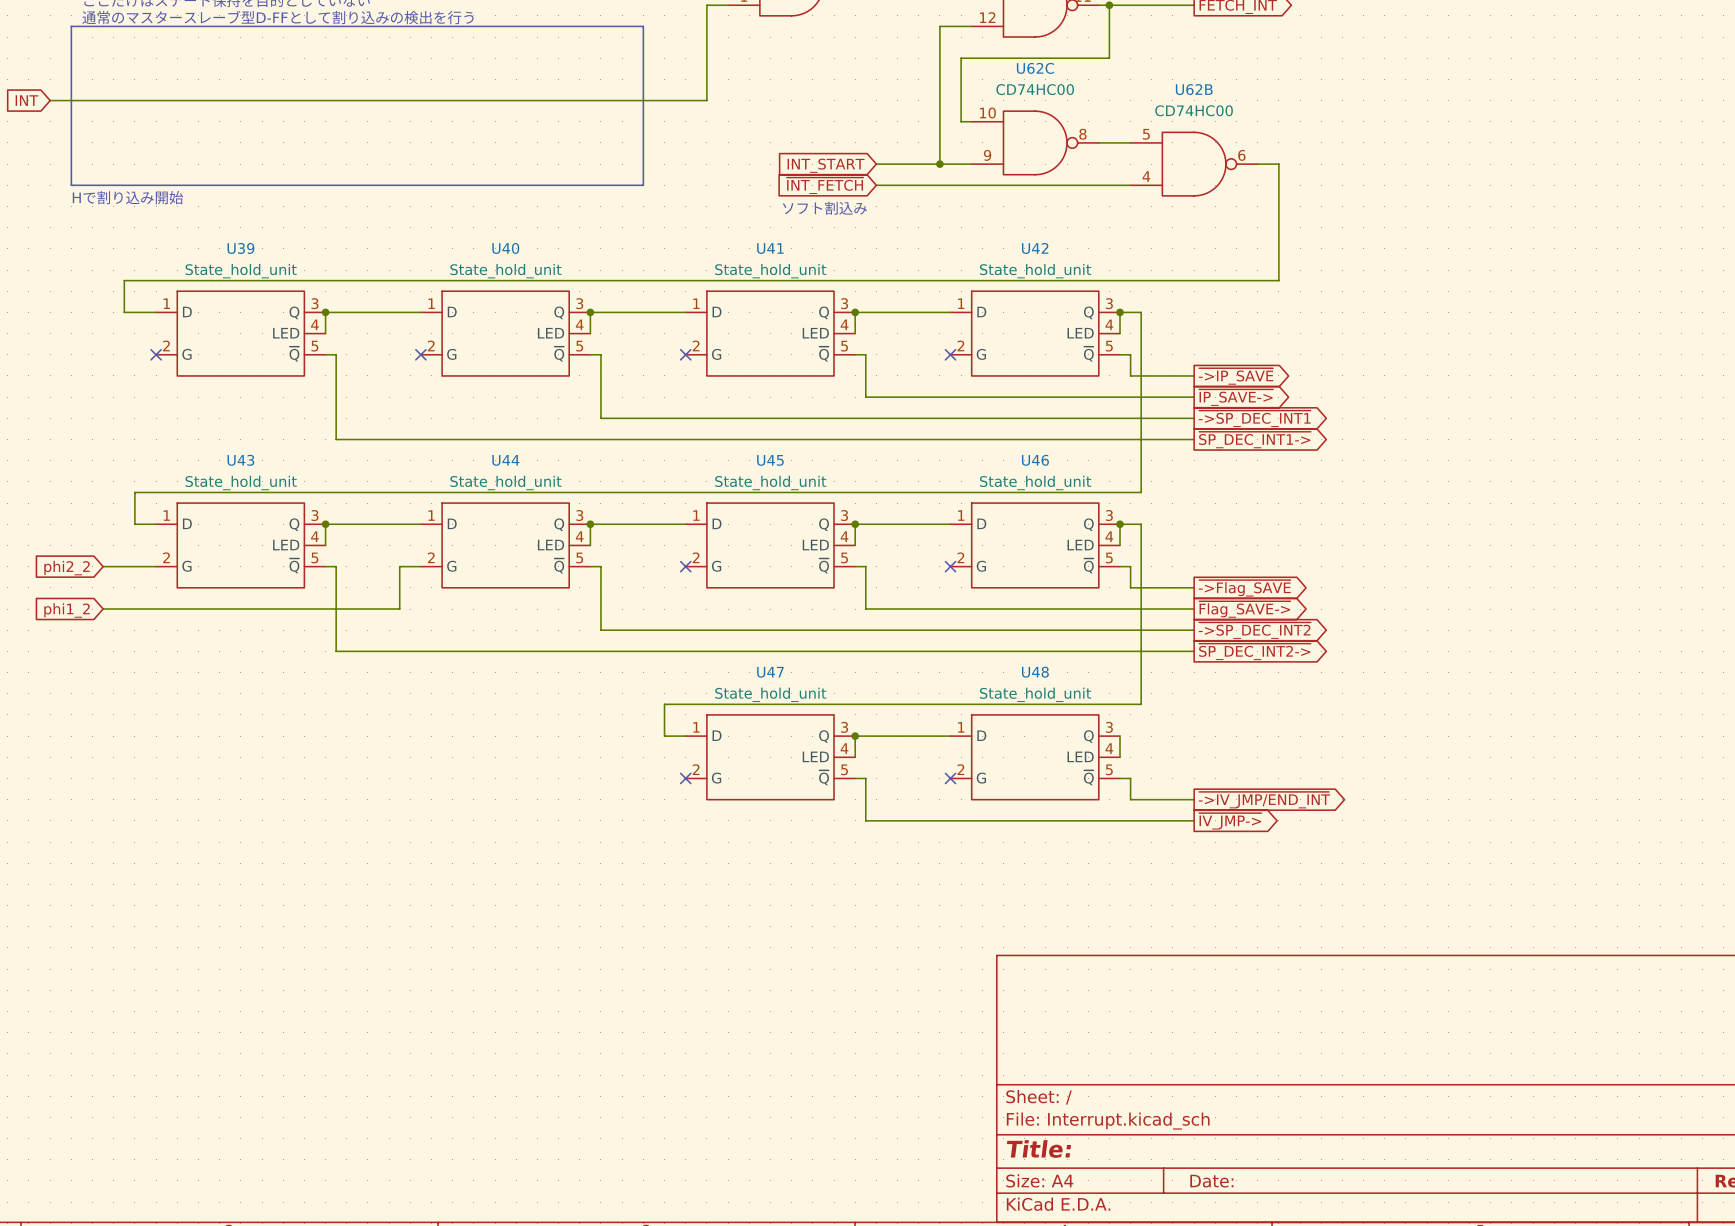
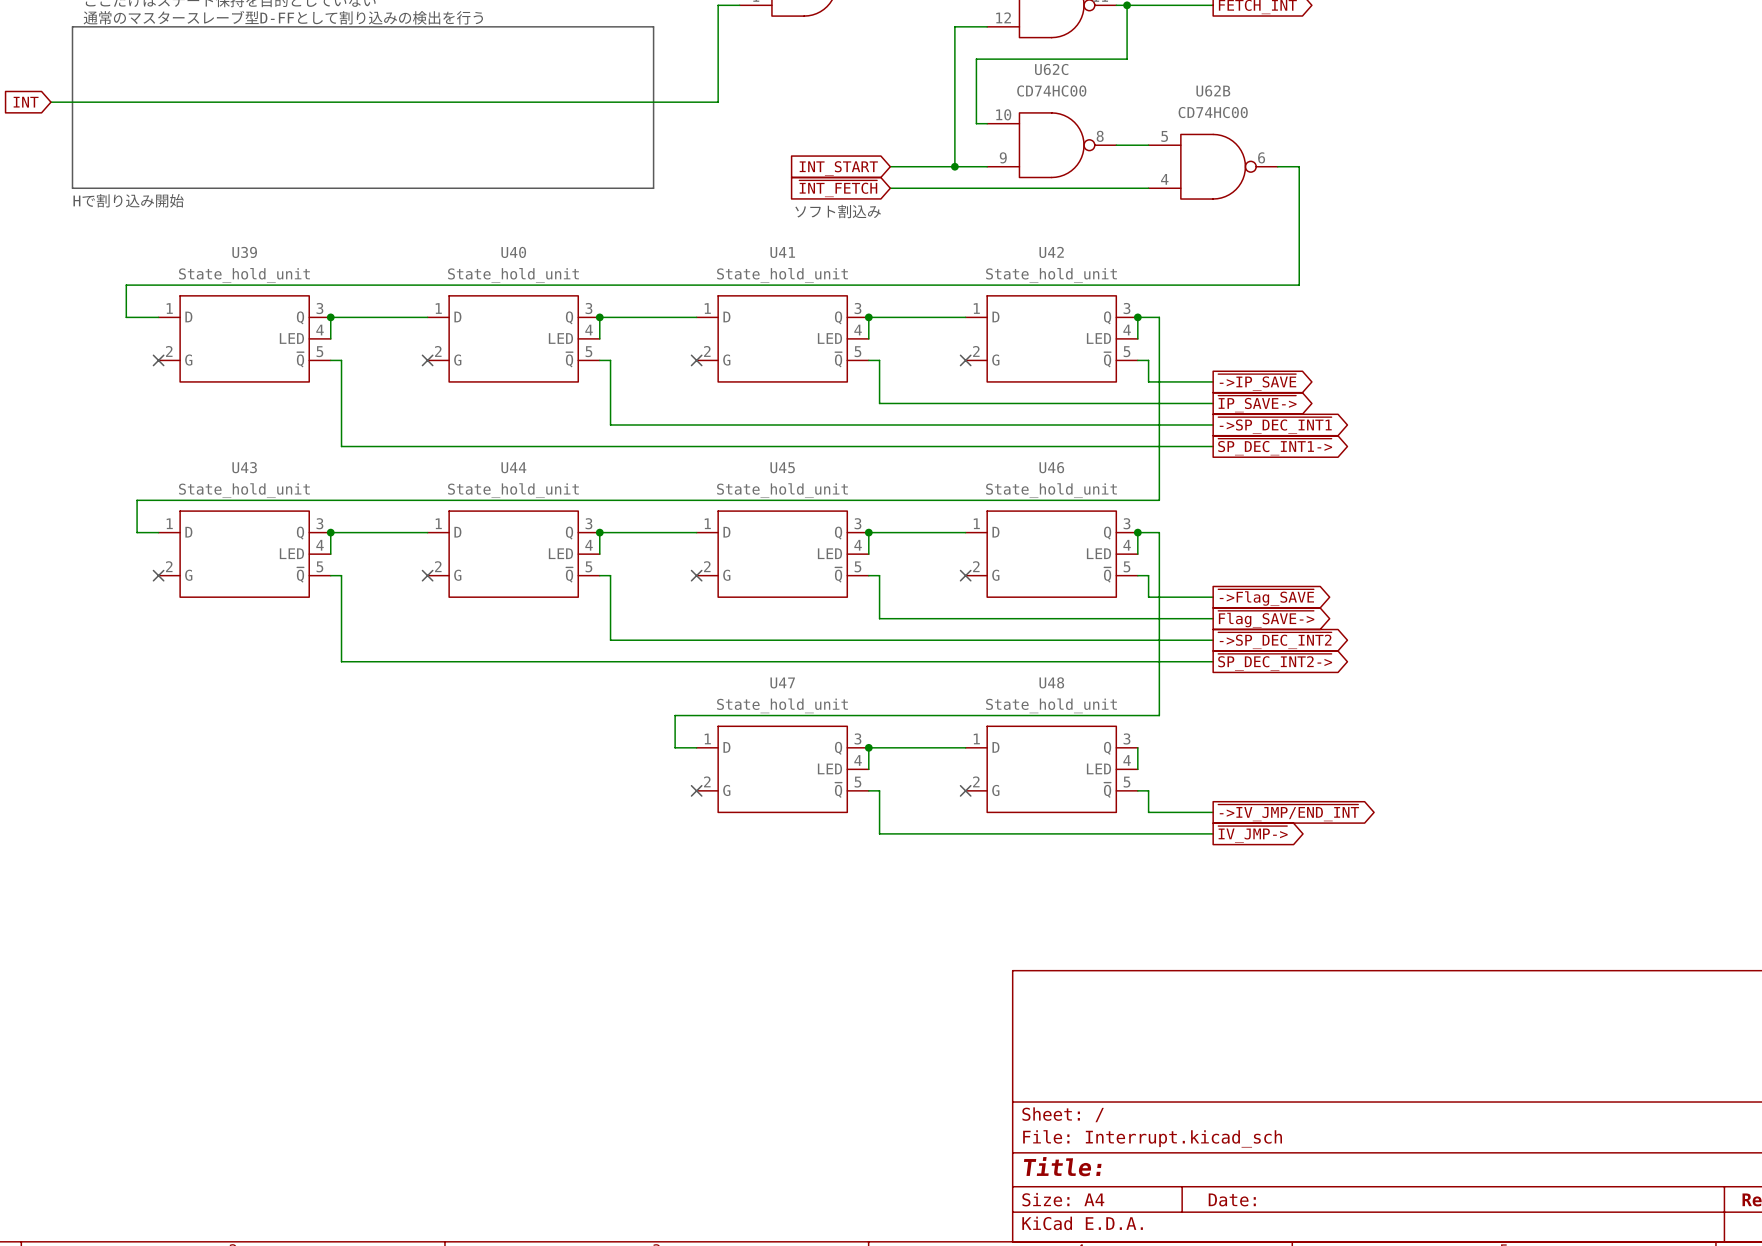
wire: (103, 566) (156, 566) -> none
no-connect mark: none -> (158, 575)
wire: (420, 566) (399, 566) (399, 609) (103, 609) -> none
no-connect mark: none -> (427, 575)
global label: phi2_2 (67, 568) -> none
global label: phi1_2 (67, 610) -> none

